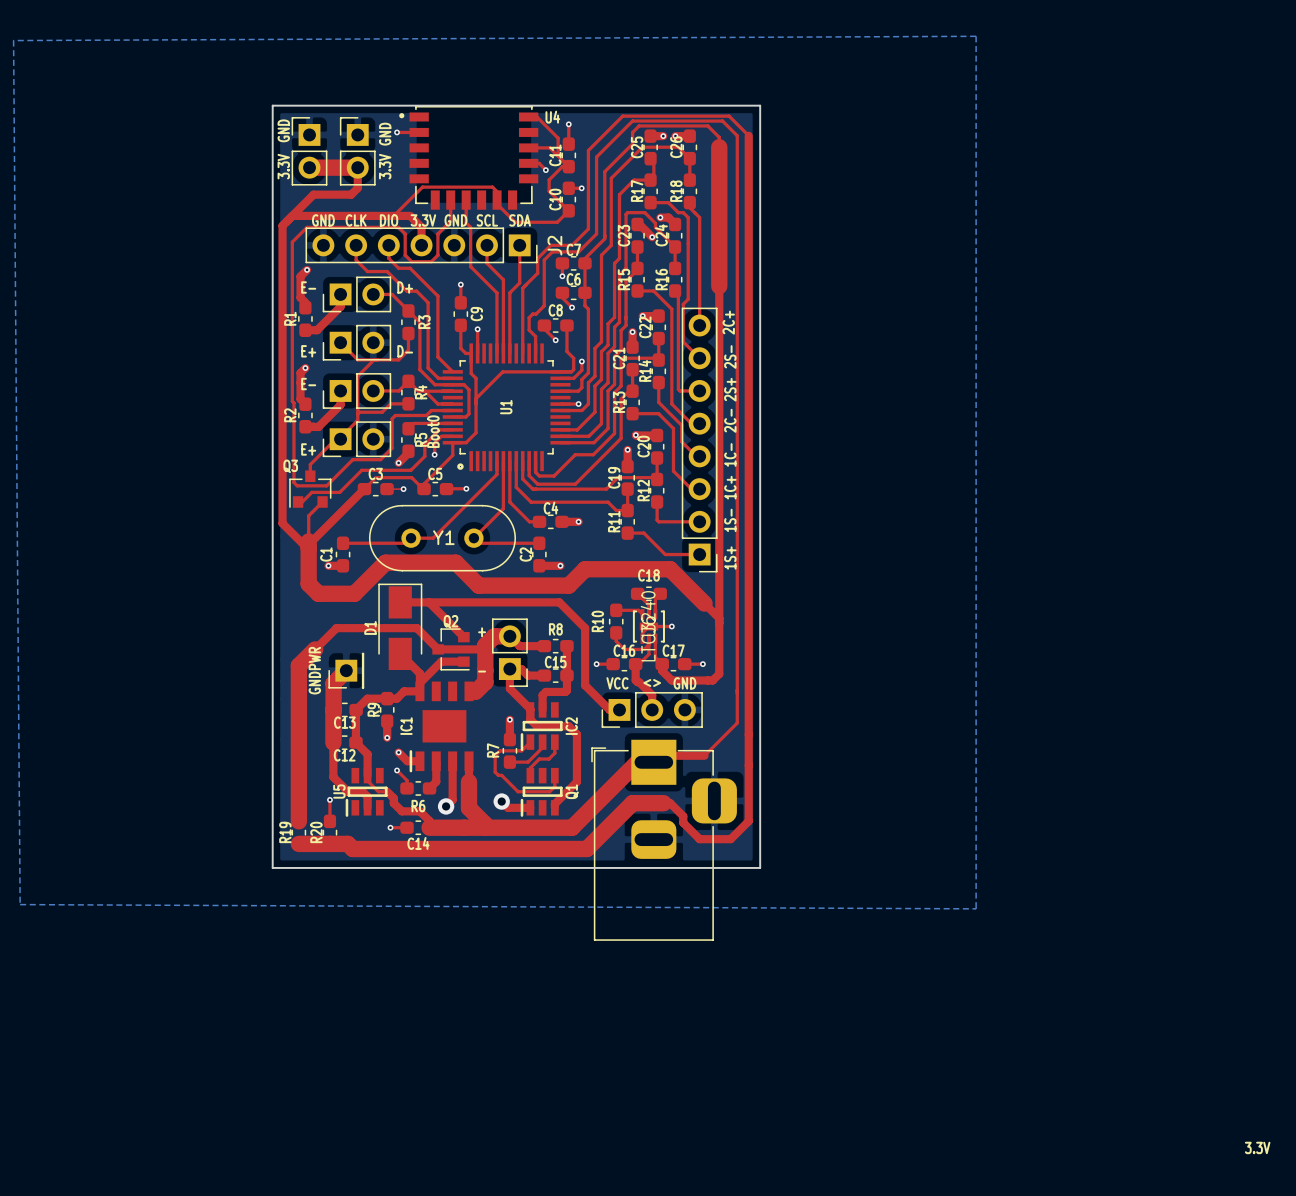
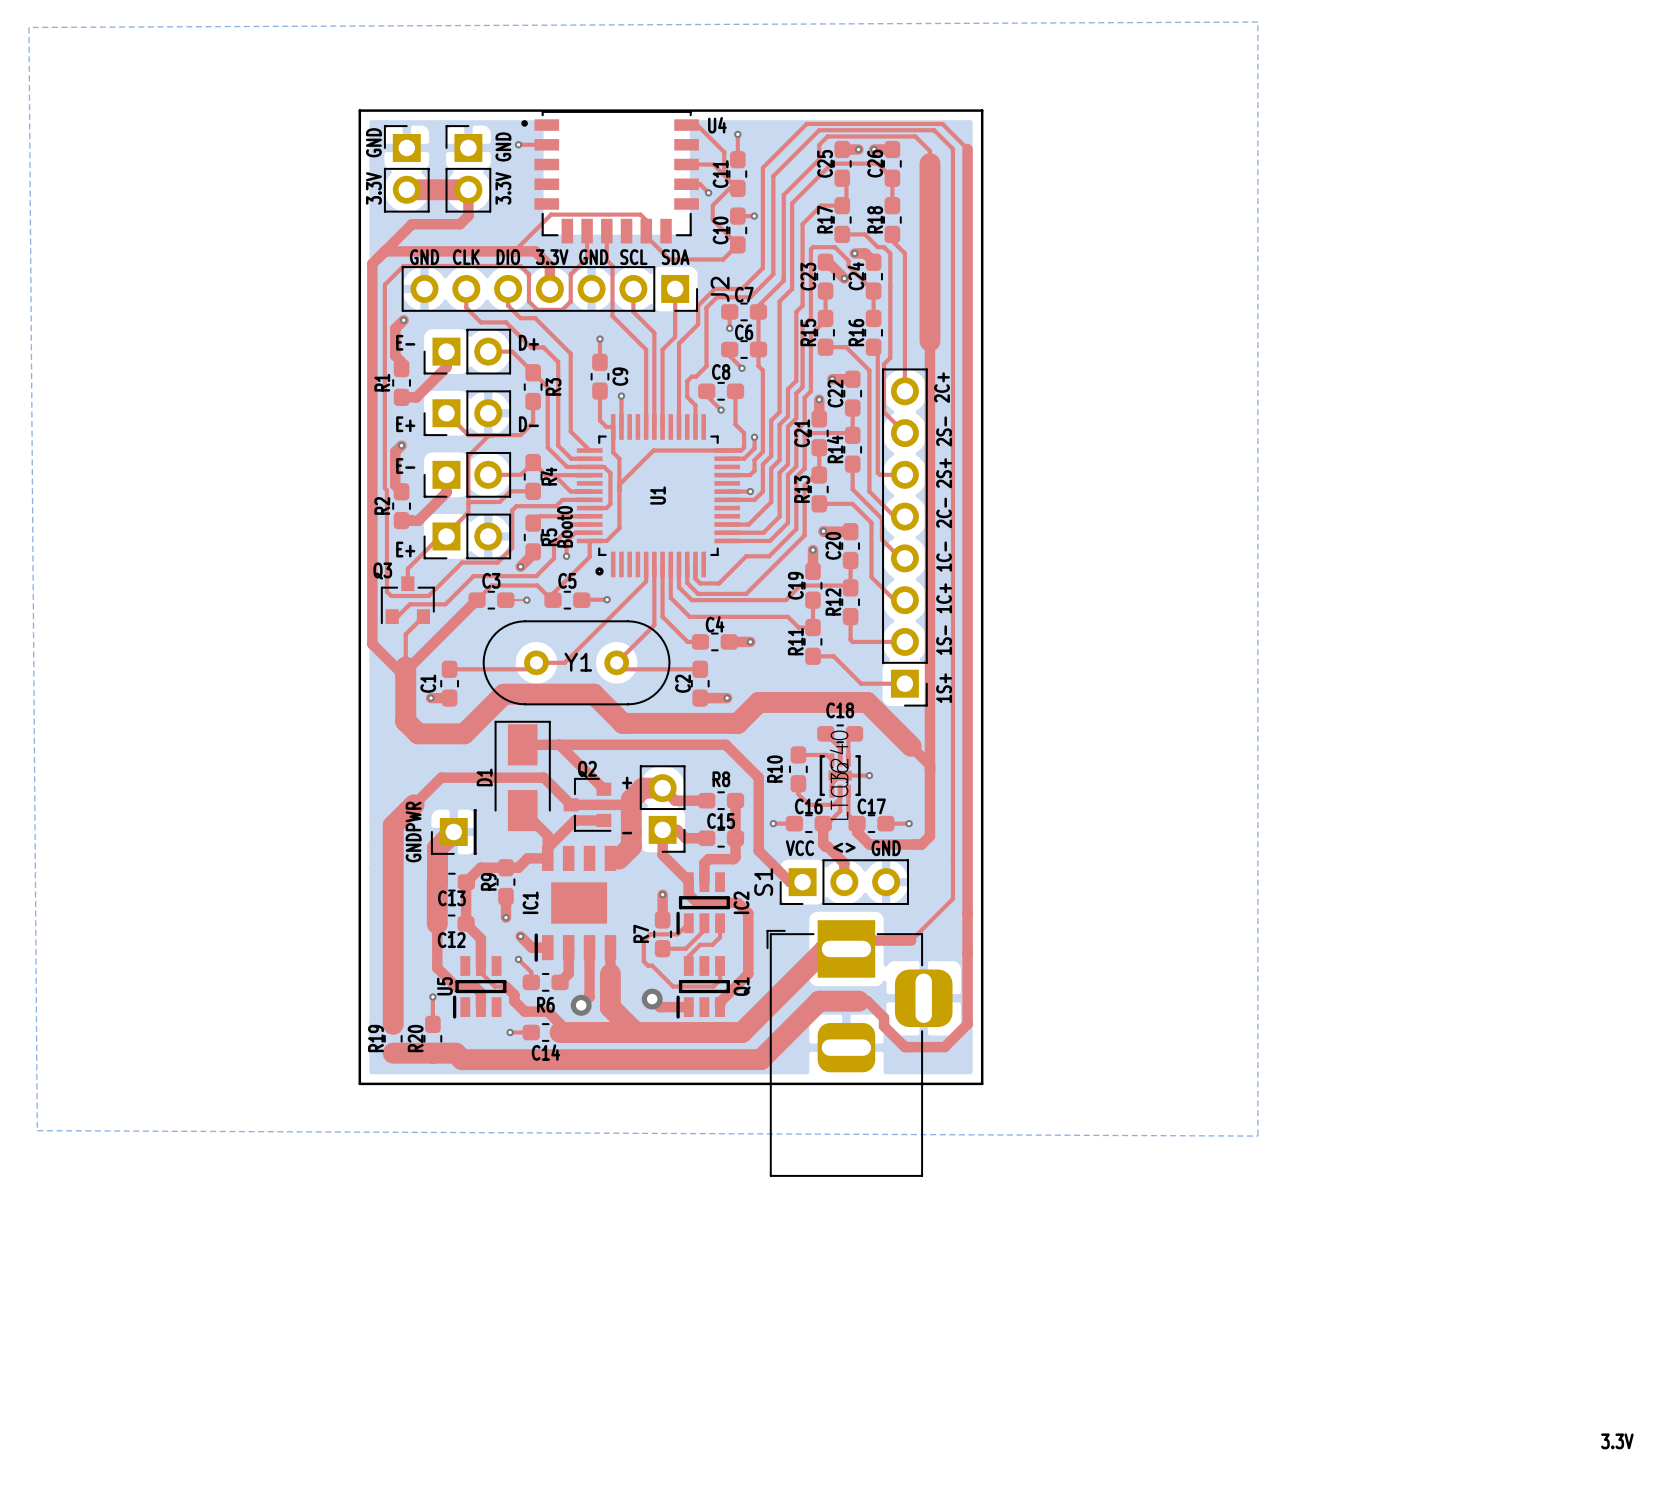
S1 name: none -> S1 (763, 882)

